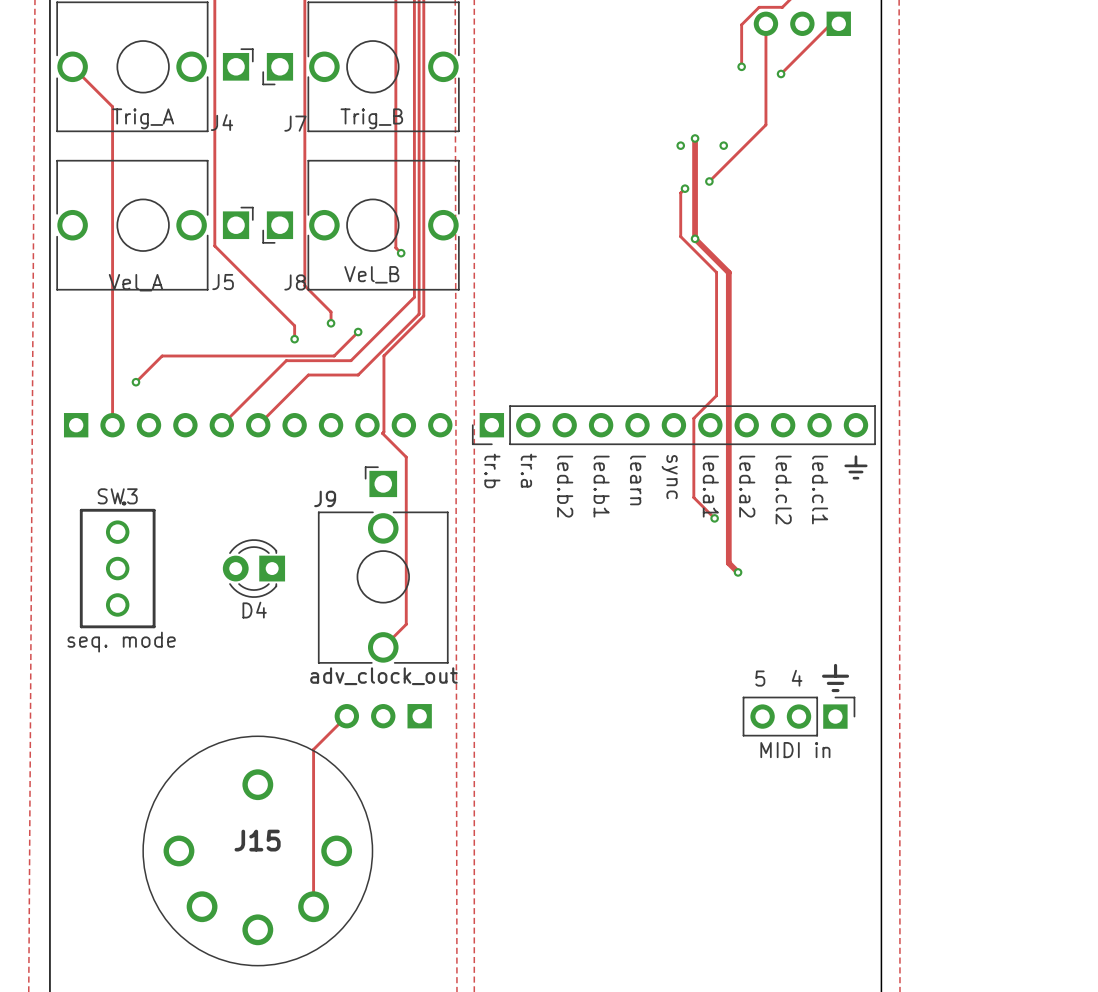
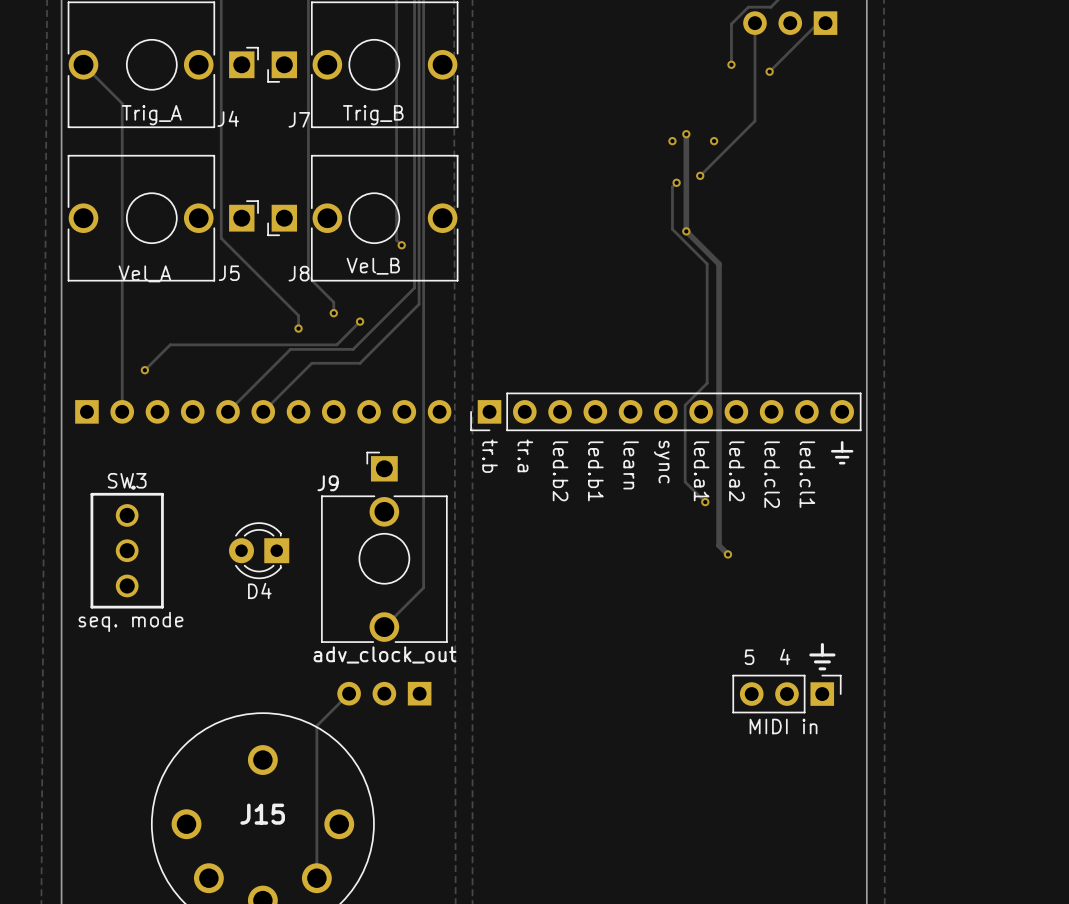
track: (423, 316) (383, 355) (382, 433) (406, 457) (406, 624) -> (423, 306) (423, 587) (406, 604)

